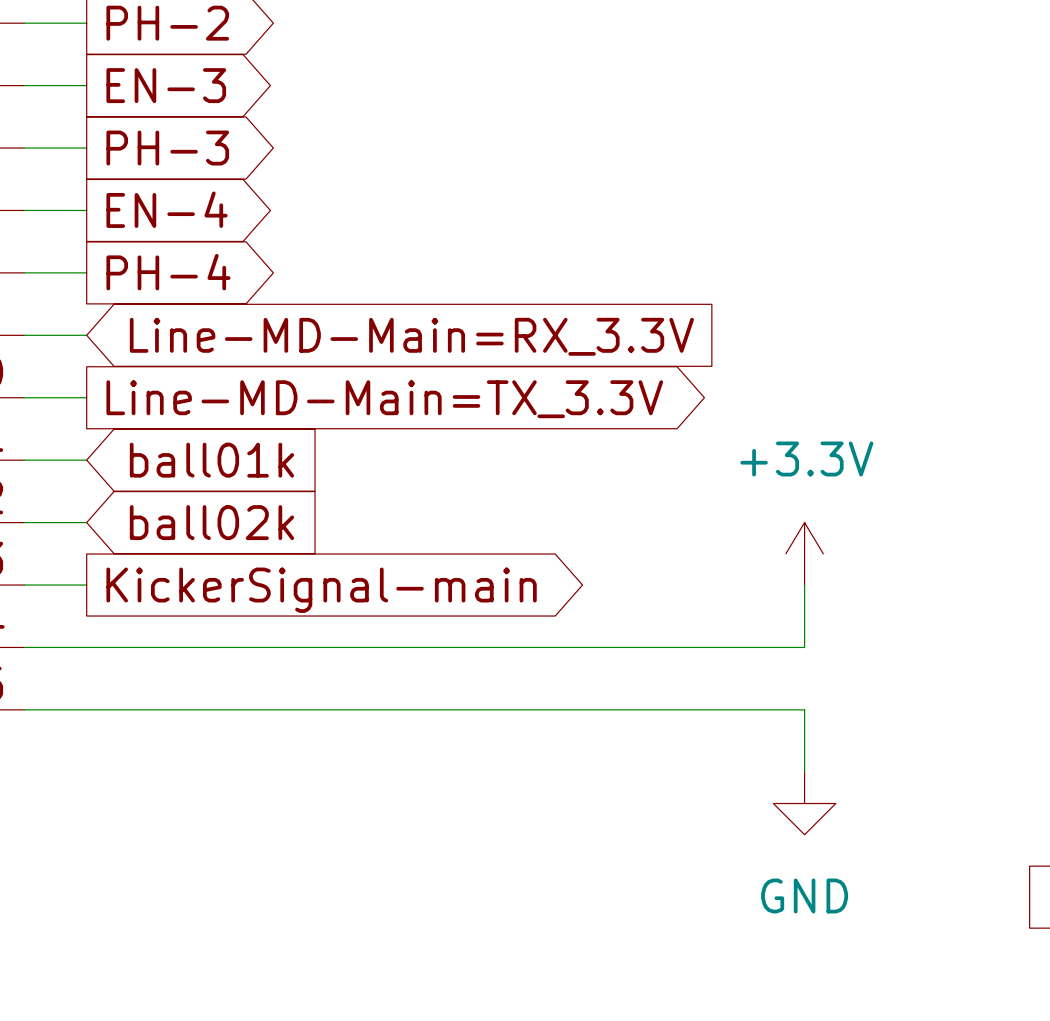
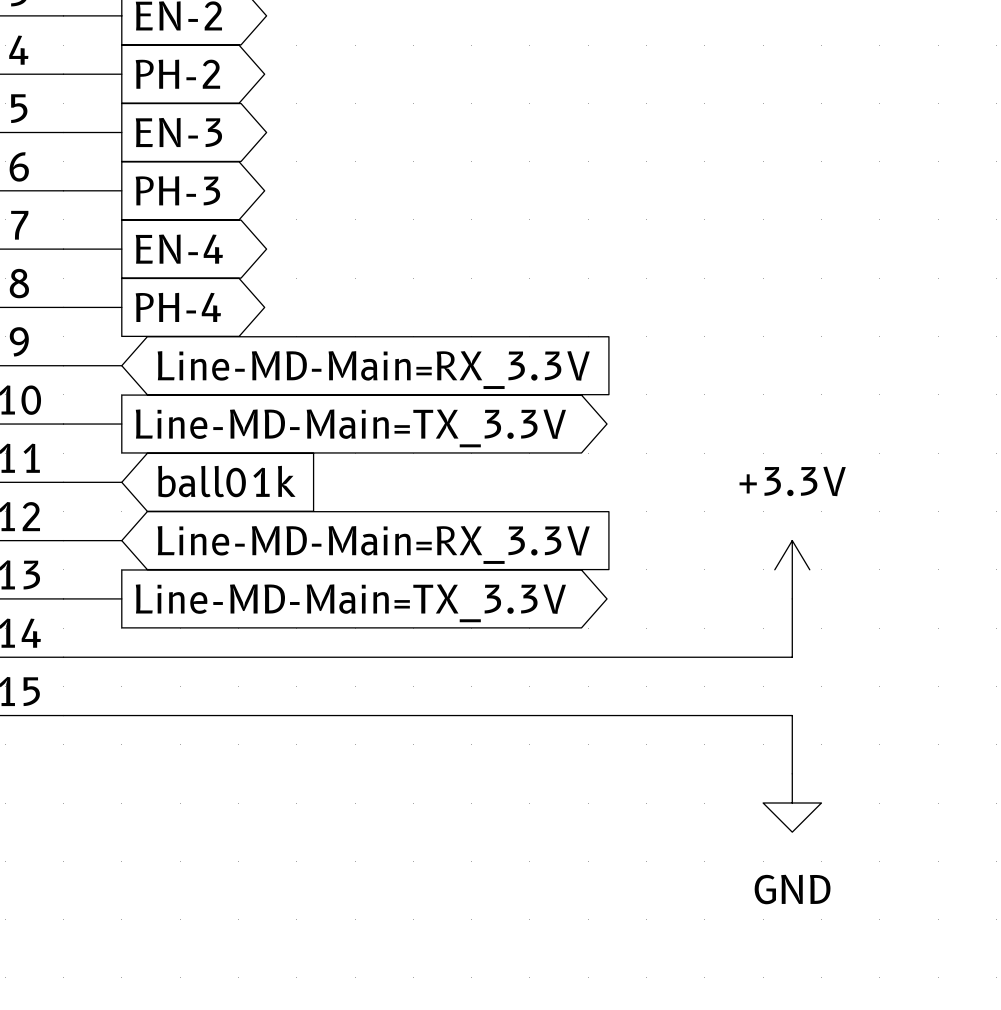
global label: ball02k (211, 522) -> Line-MD-Main=RX_3.3V (373, 544)
global label: KickerSignal-main (321, 590) -> Line-MD-Main=TX_3.3V (350, 603)

